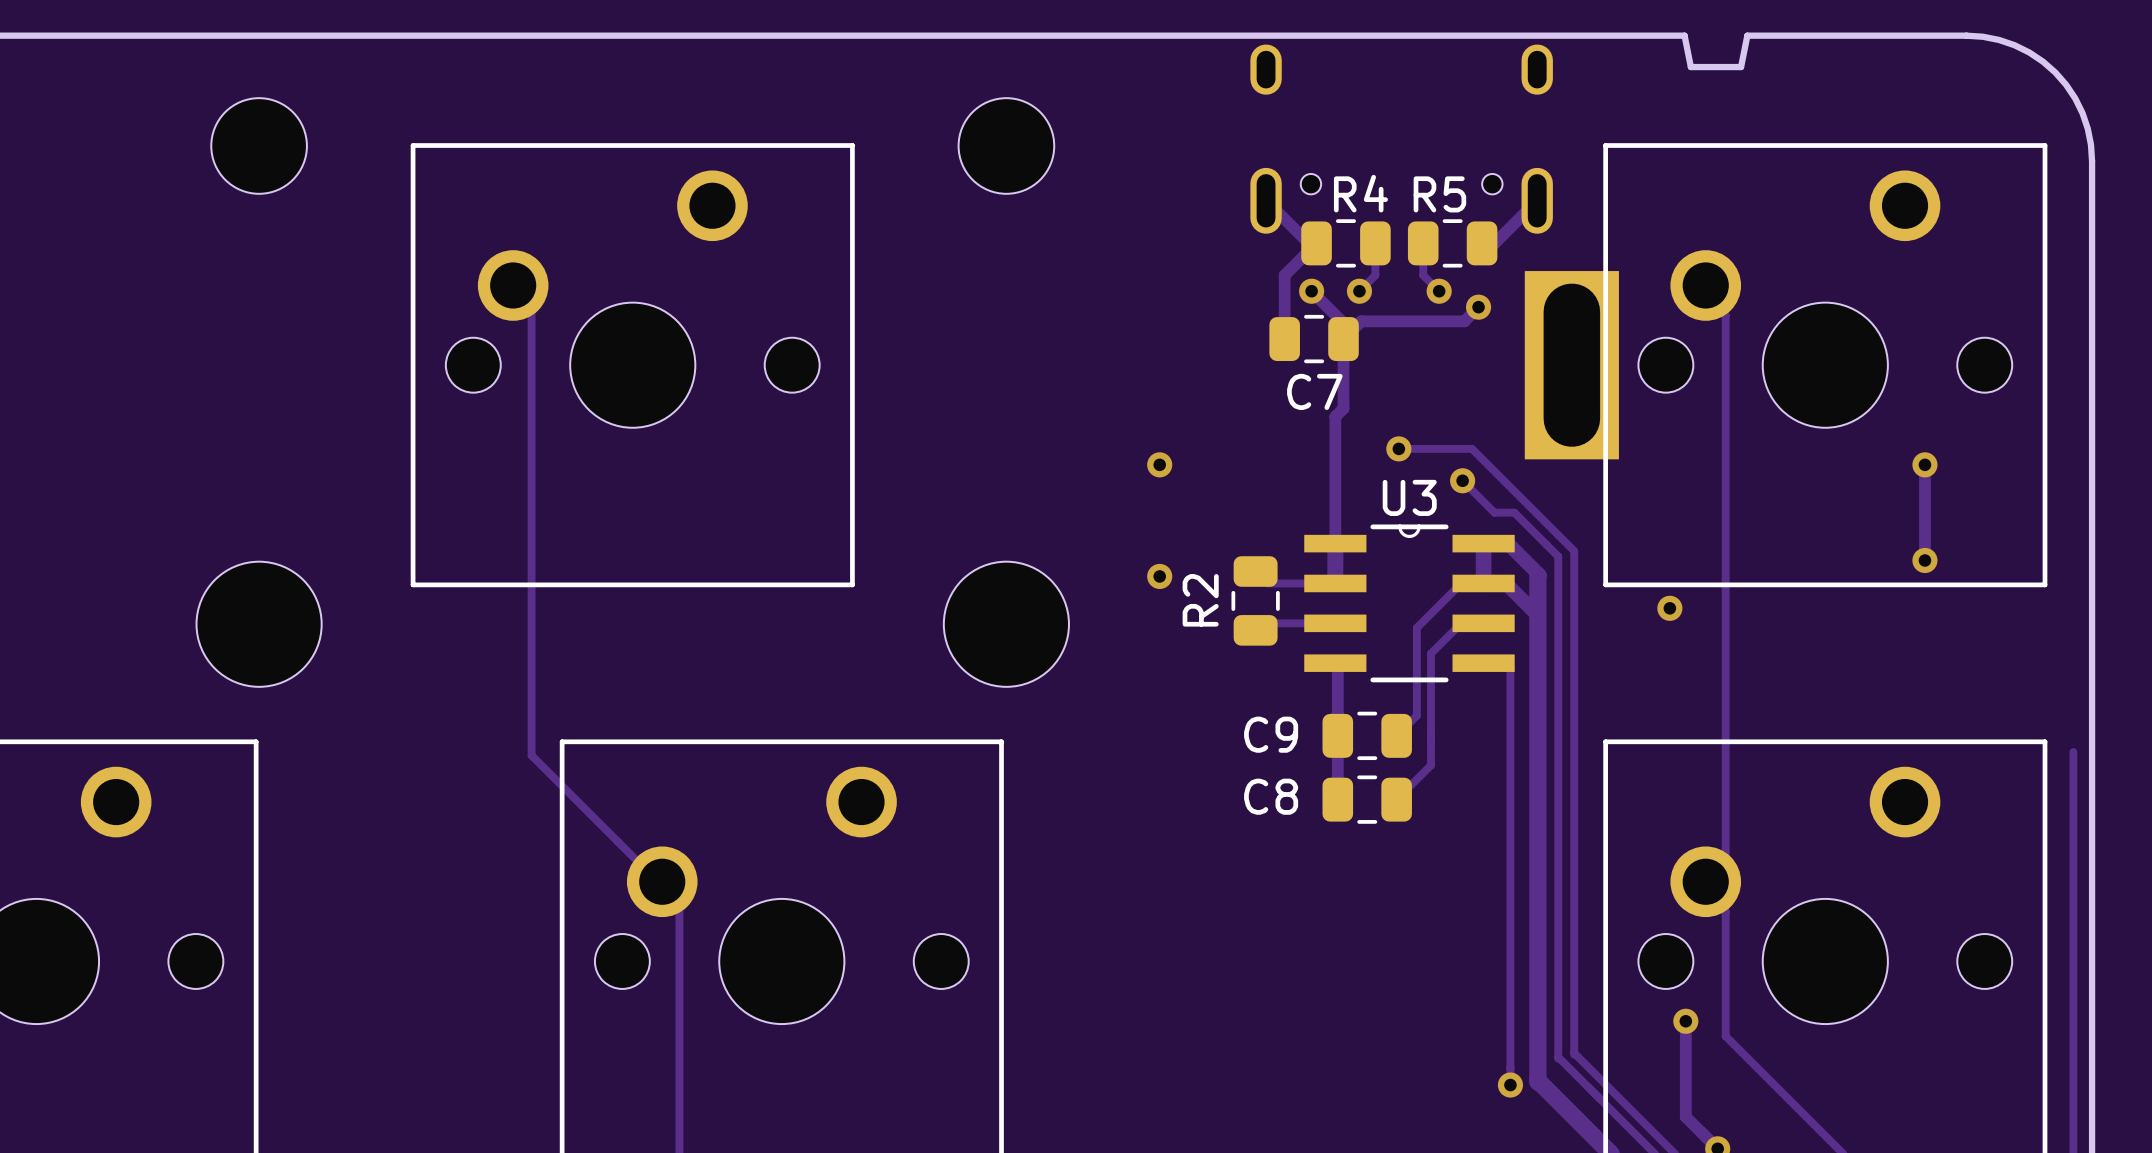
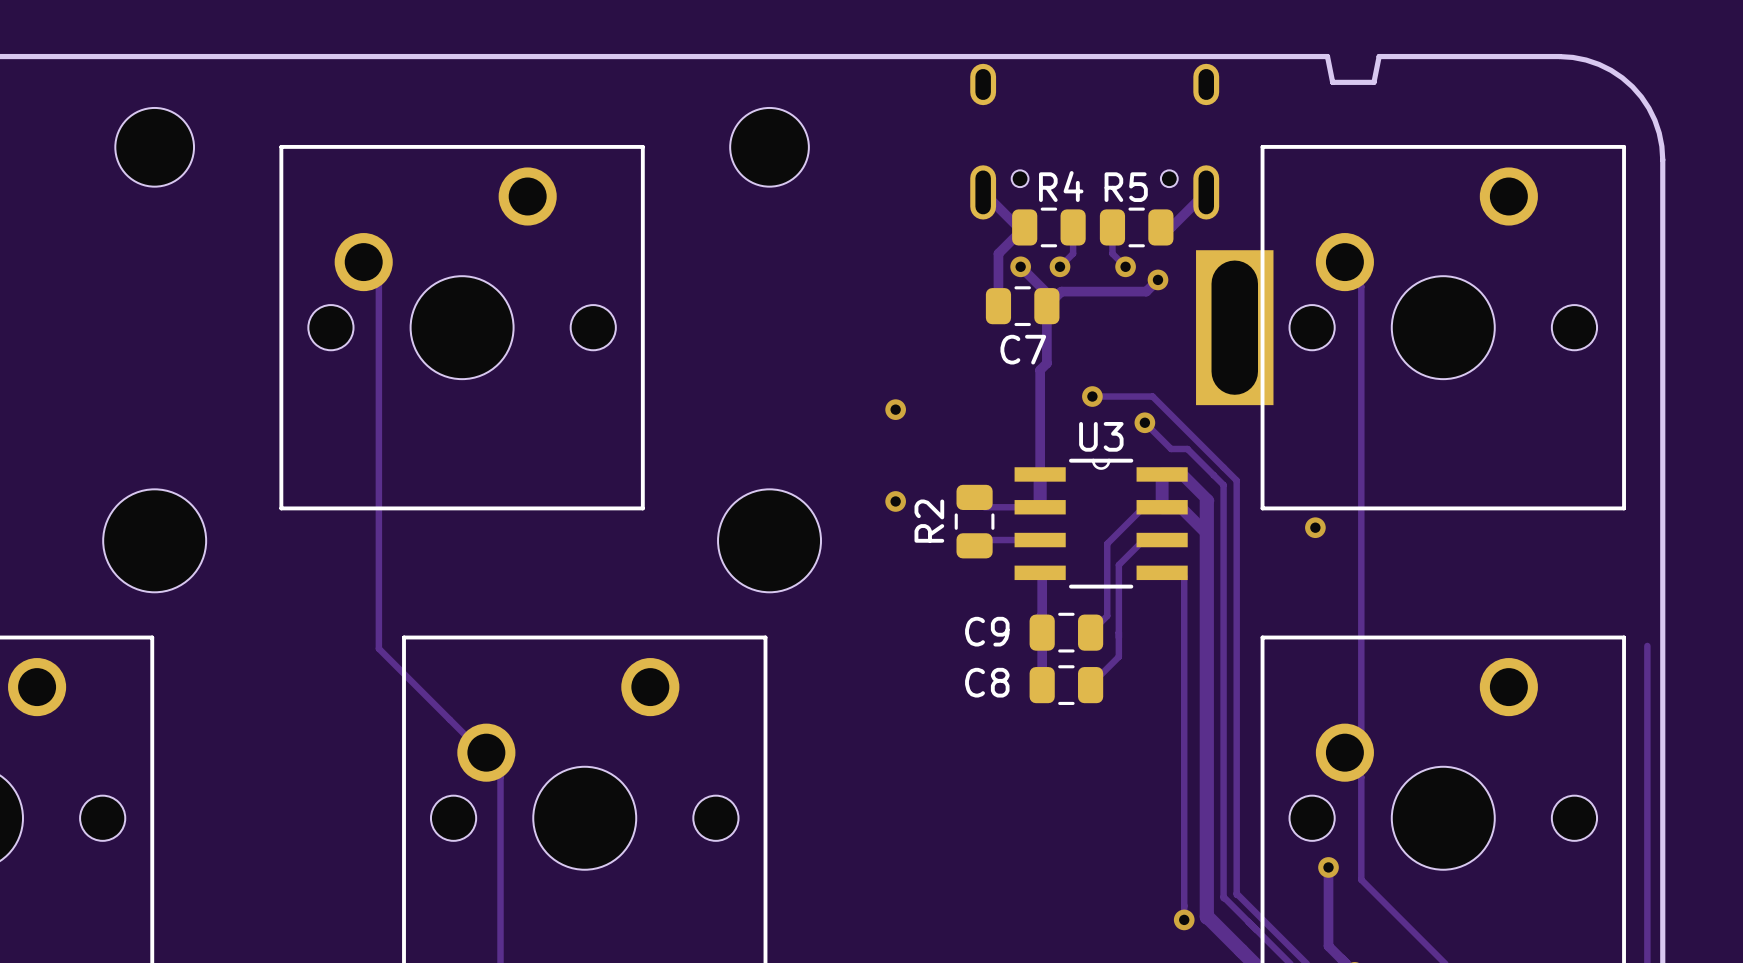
track: (1924, 464) (1924, 560) -> none
via: (1924, 464) -> none
via: (1924, 560) -> none

